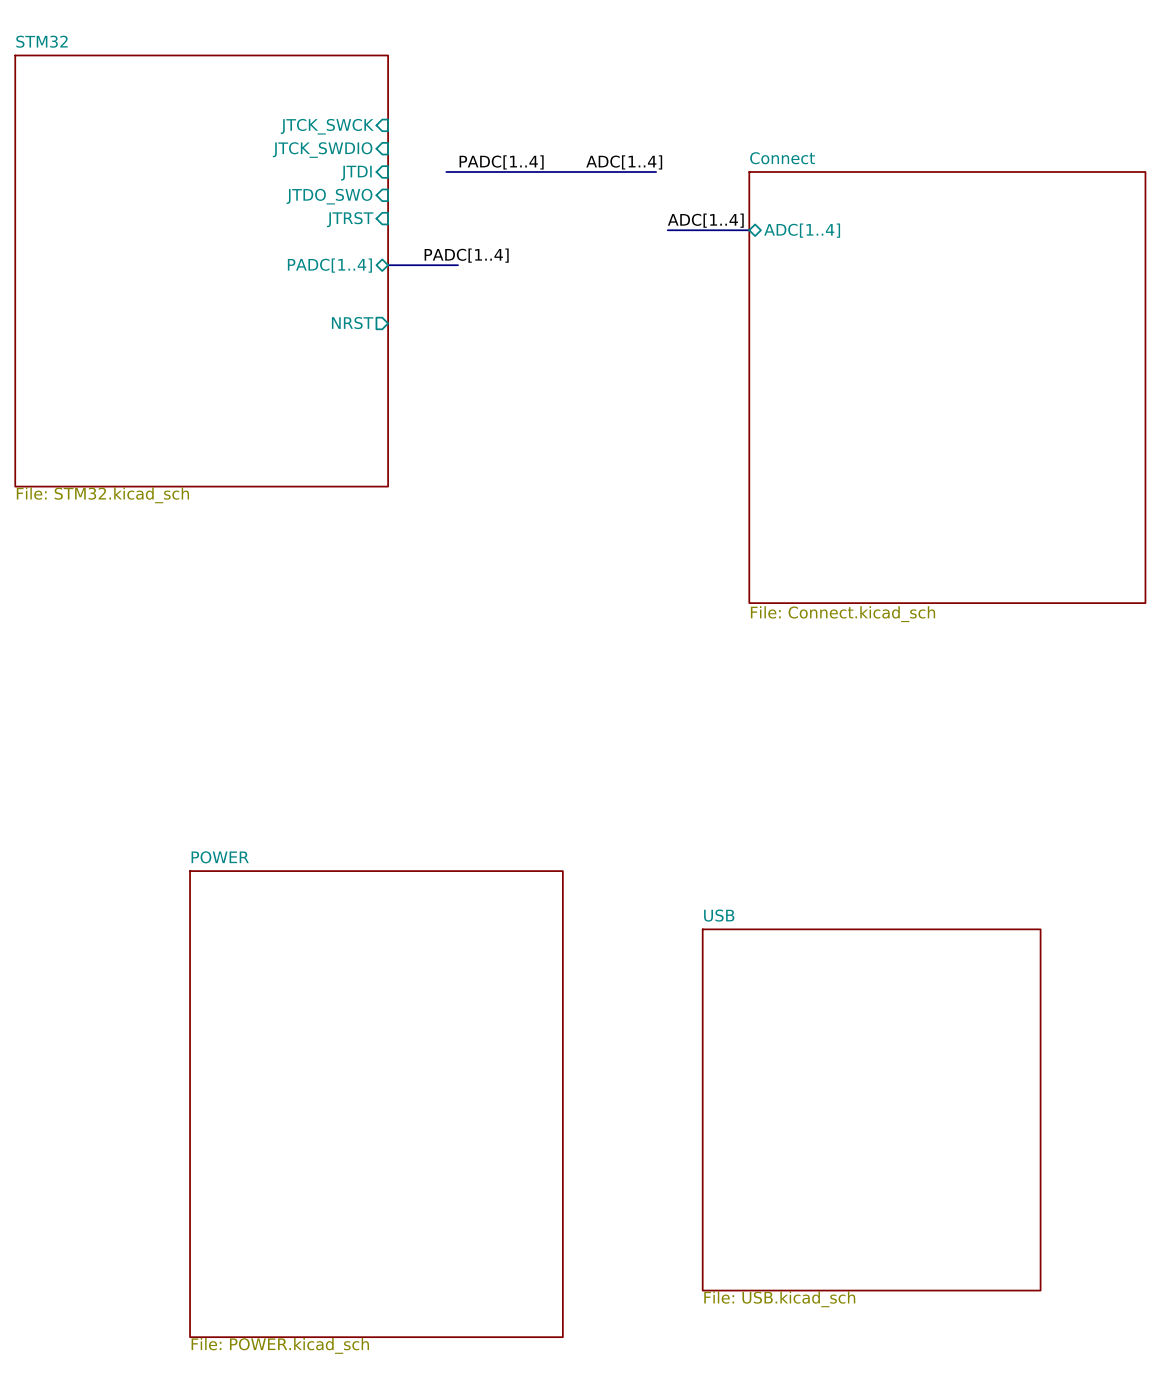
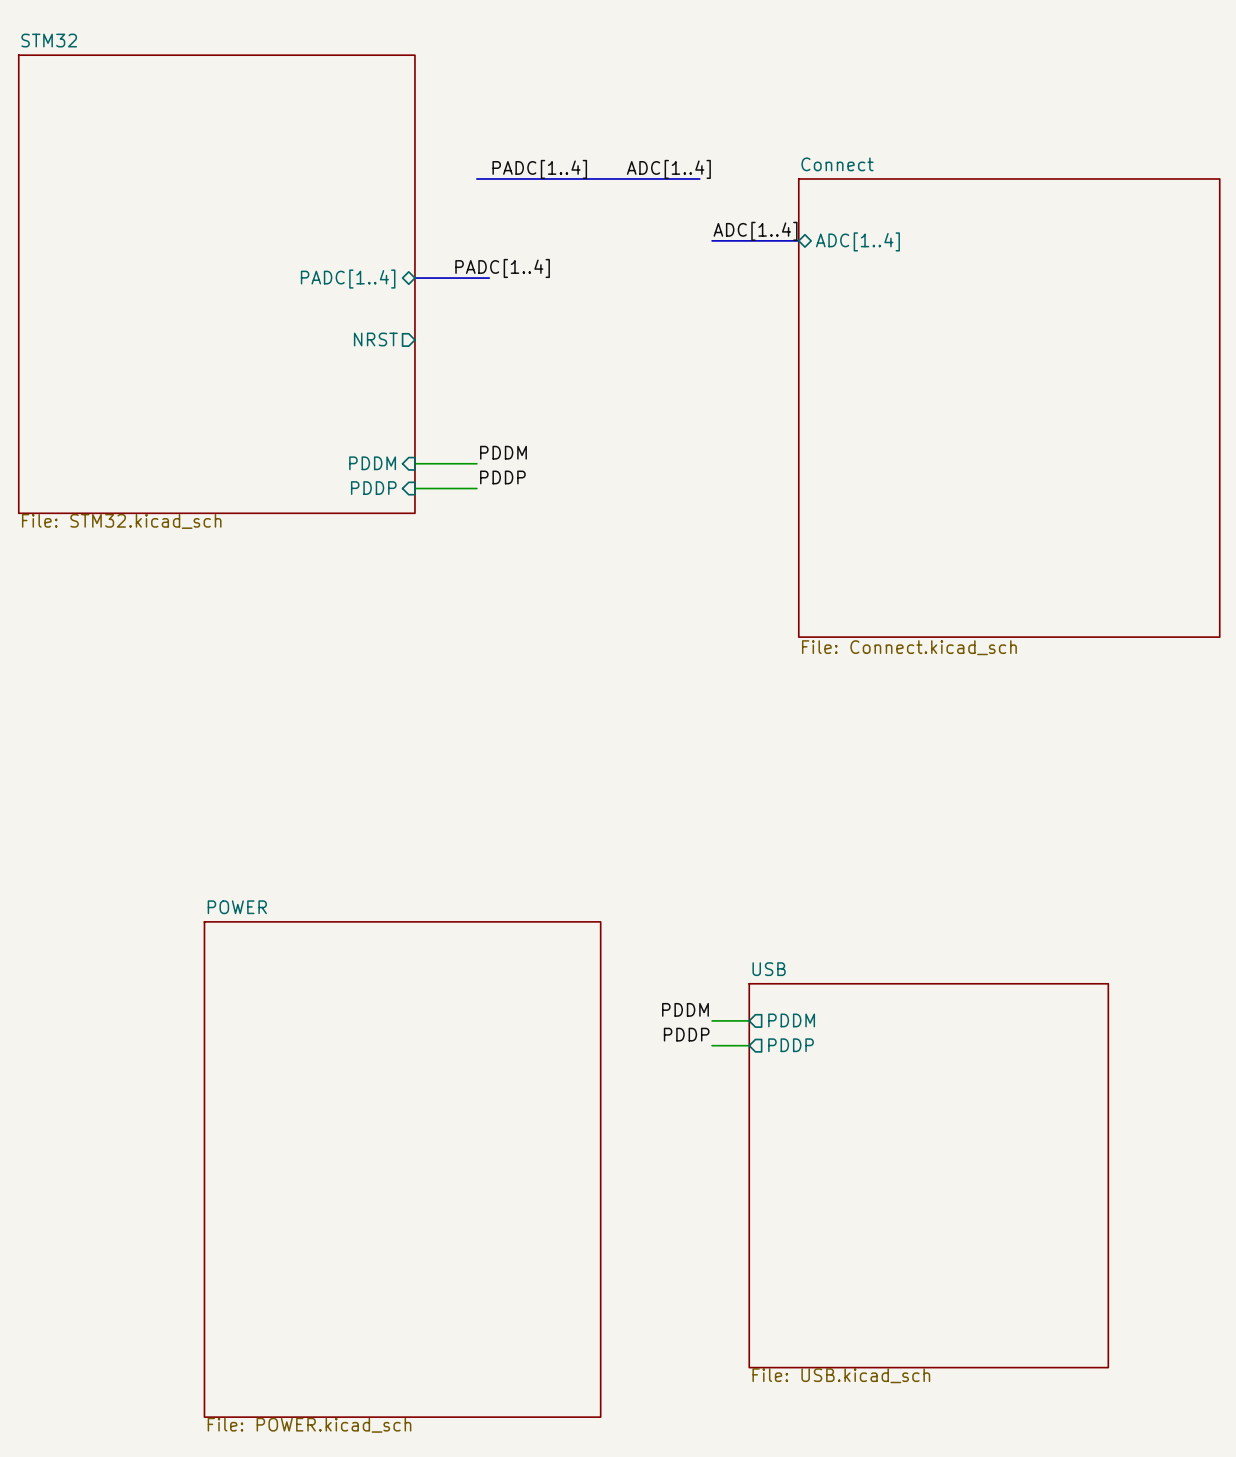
sheet pin: JTCK_SWCK (327, 126) -> none
sheet pin: JTCK_SWDIO (322, 150) -> none
sheet pin: JTDI (356, 173) -> none
sheet pin: JTDO_SWO (329, 196) -> none
sheet pin: JTRST (350, 219) -> none
label: none -> PDDM (503, 452)
sheet pin: none -> PDDM (372, 463)
wire: none -> (414, 463) (476, 463)
label: none -> PDDP (502, 477)
sheet pin: none -> PDDP (373, 488)
wire: none -> (414, 488) (476, 488)
label: none -> PDDM (685, 1009)
sheet pin: none -> PDDM (791, 1020)
wire: none -> (712, 1020) (749, 1020)
label: none -> PDDP (686, 1034)
wire: none -> (712, 1045) (749, 1045)
sheet pin: none -> PDDP (791, 1045)

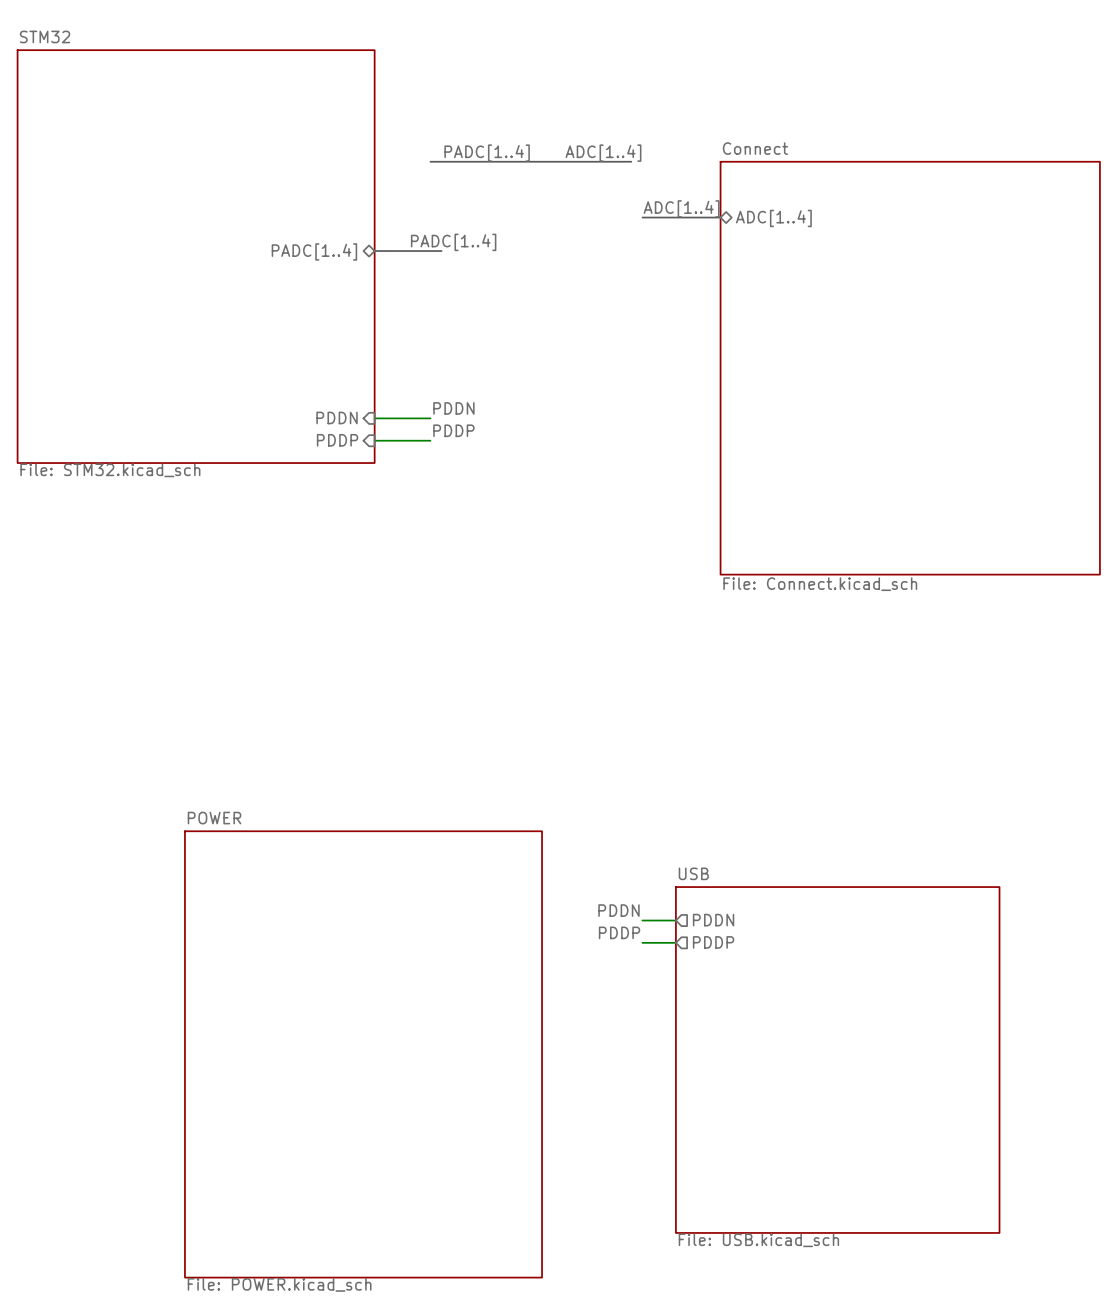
sheet pin: NRST (375, 339) -> none
label: PDDM (503, 452) -> PDDN (453, 408)
sheet pin: PDDM (372, 463) -> PDDN (337, 417)
label: PDDM (685, 1009) -> PDDN (618, 910)
sheet pin: PDDM (791, 1020) -> PDDN (713, 920)

